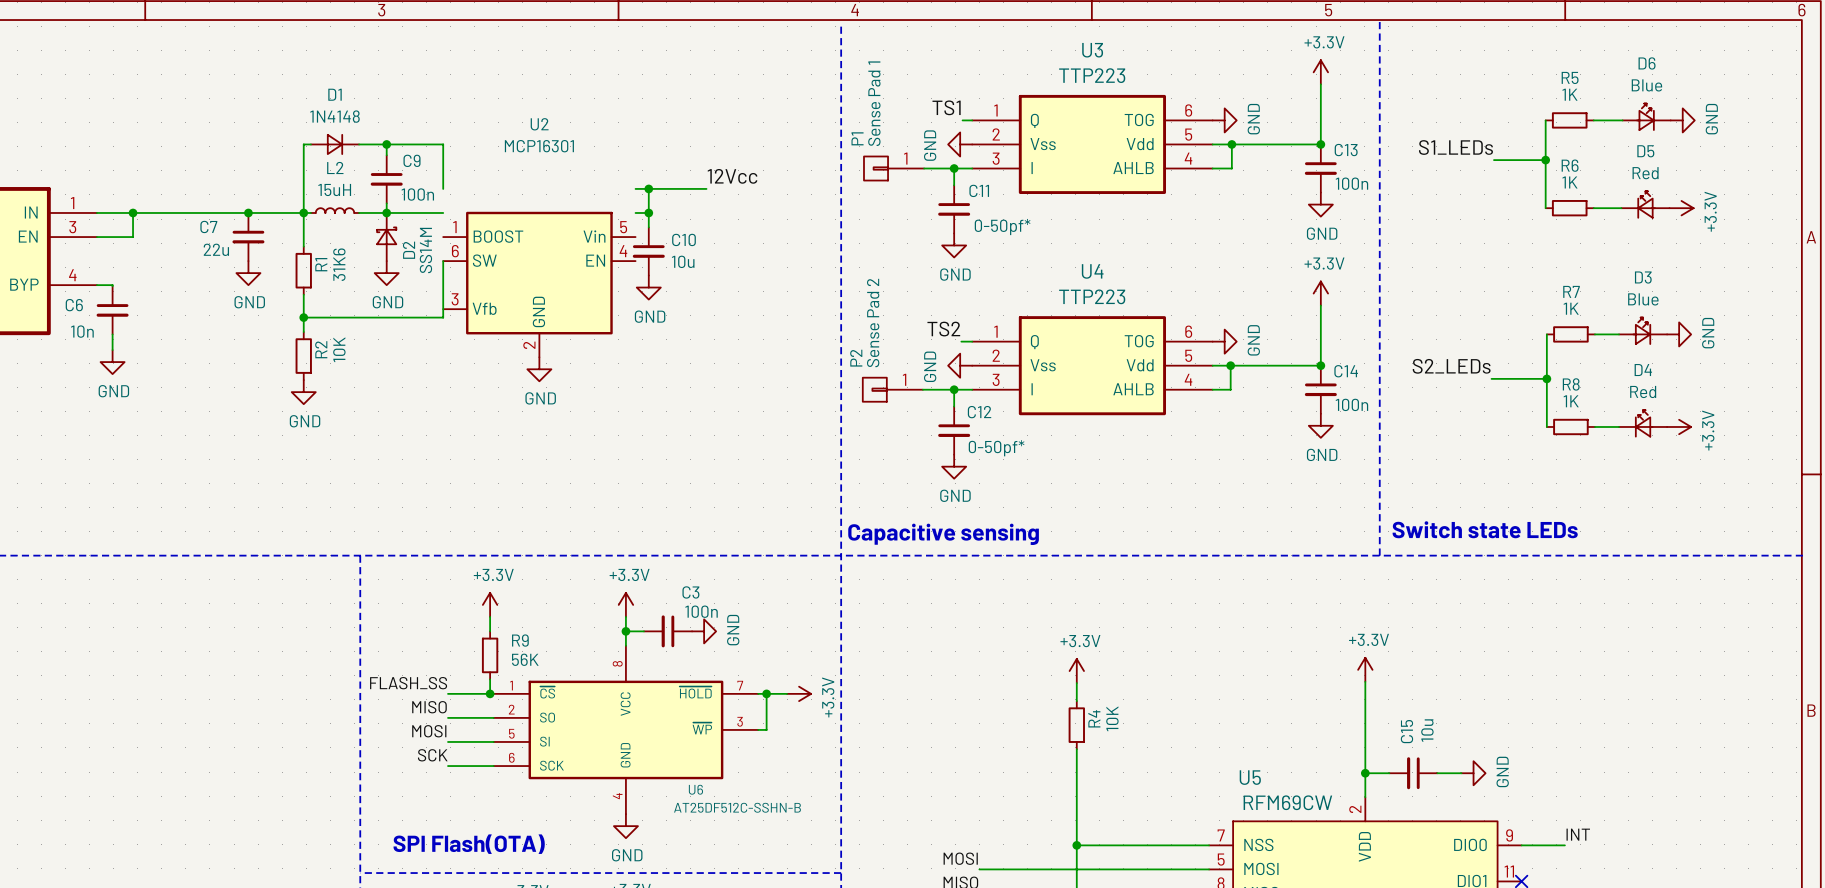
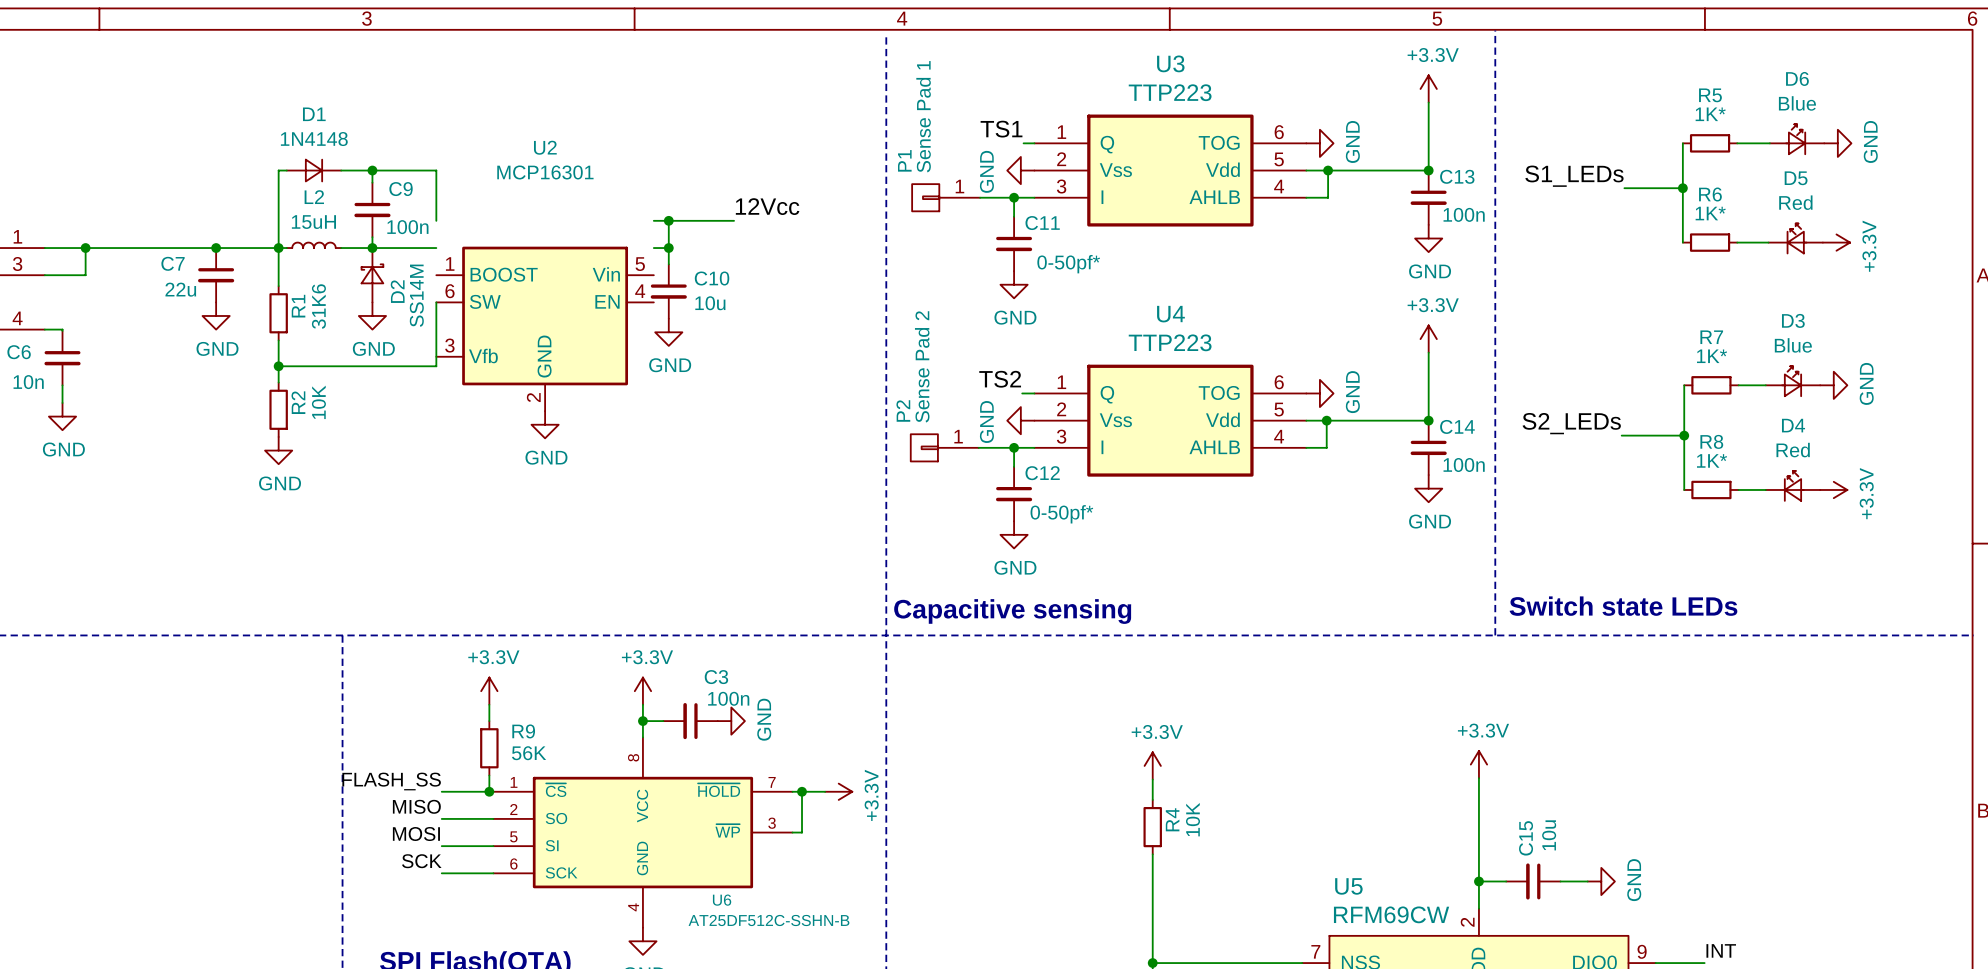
R5 value: 1K (1569, 94) -> 1K* (1710, 114)
R6 value: 1K (1569, 182) -> 1K* (1710, 213)
R7 value: 1K (1571, 308) -> 1K* (1712, 356)
R8 value: 1K (1571, 401) -> 1K* (1712, 460)

